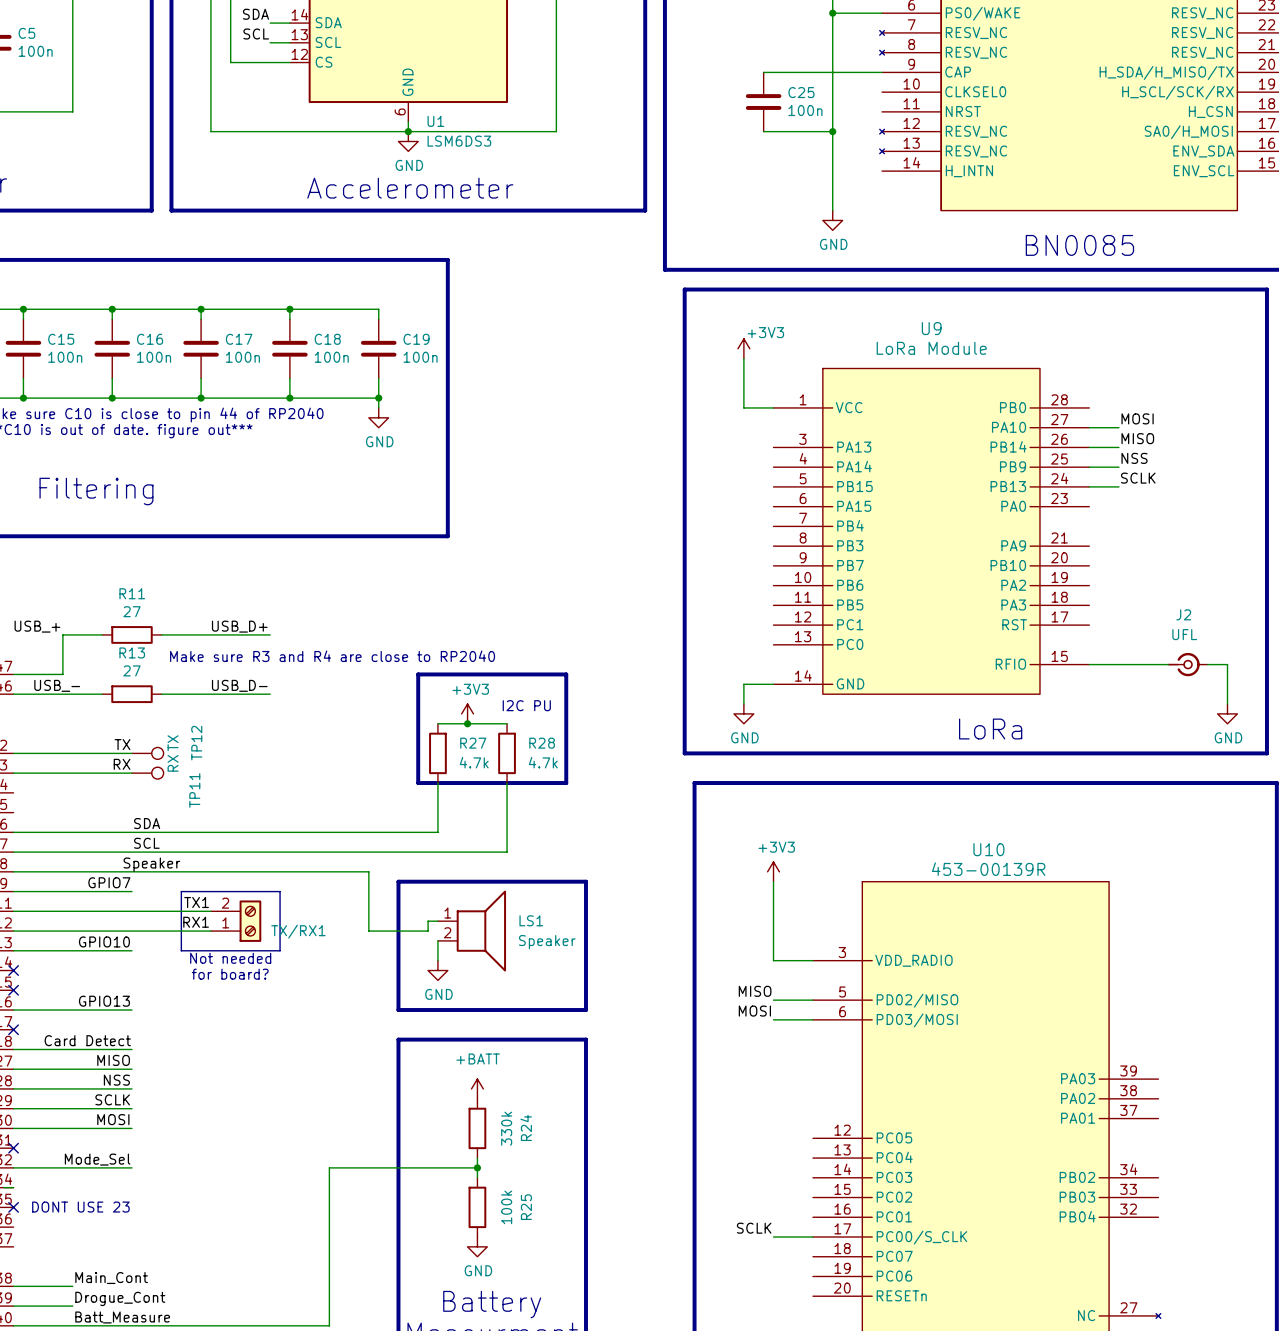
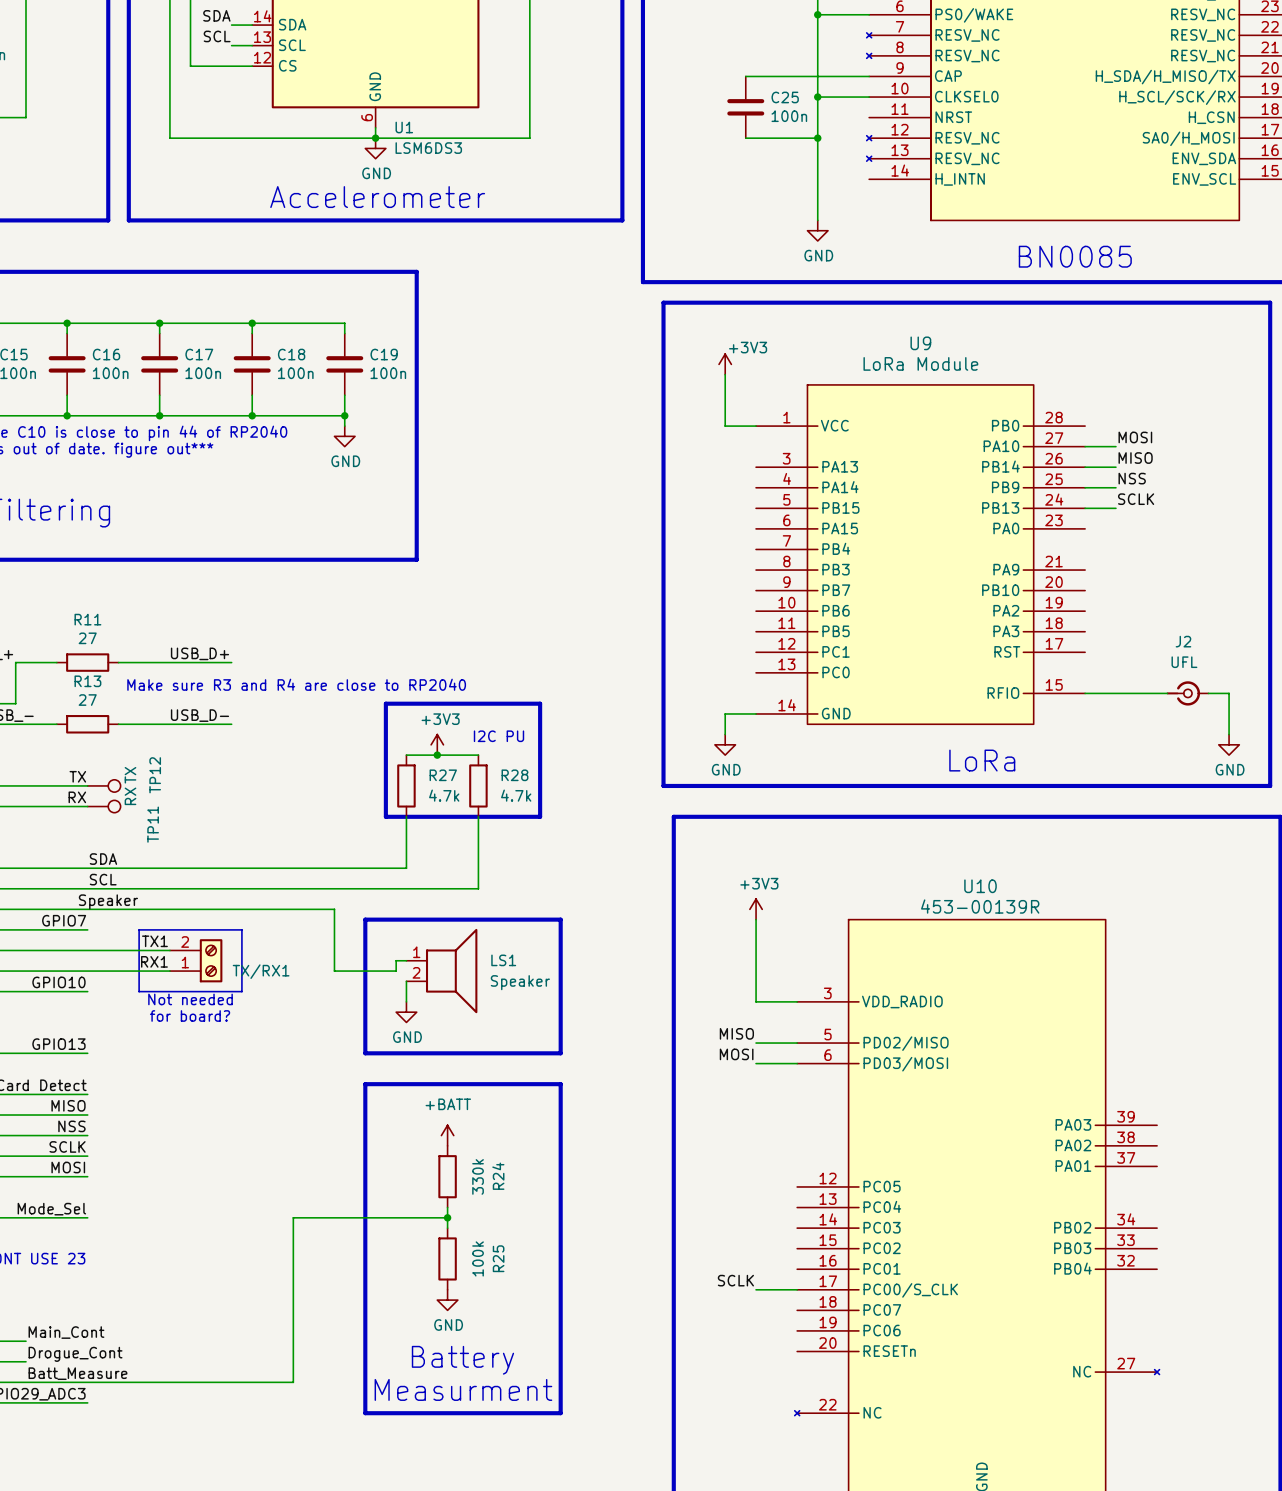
wire: none -> (817, 97) (869, 97)
junction: none -> (817, 97)

